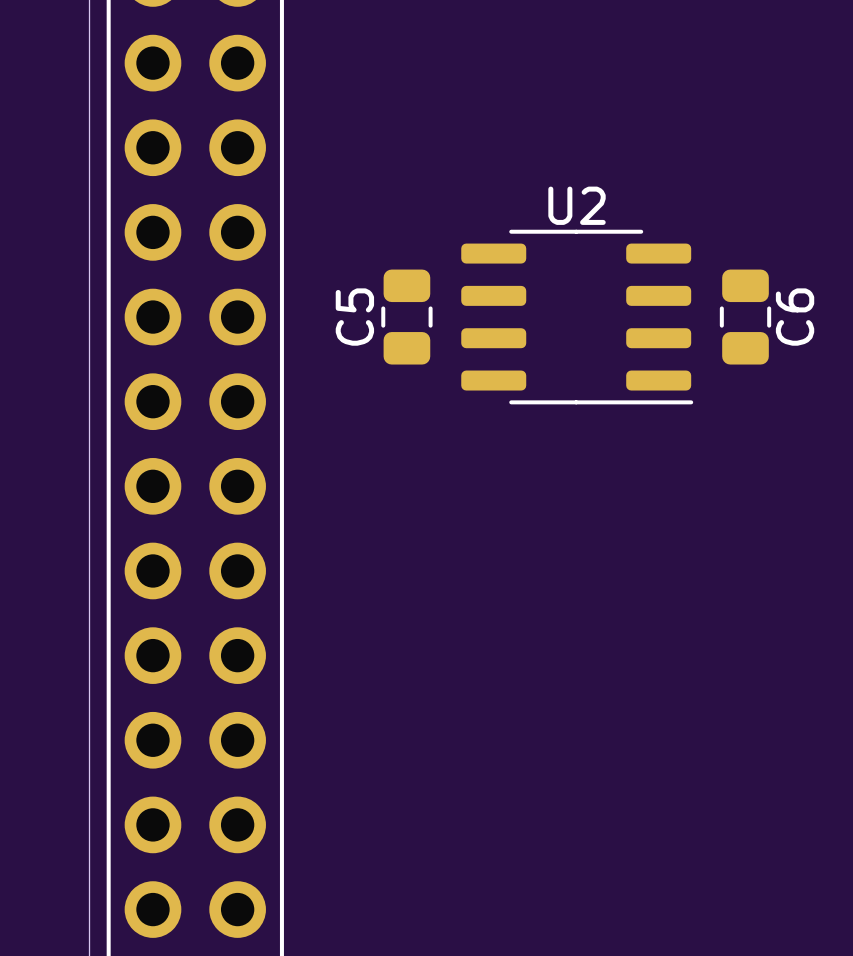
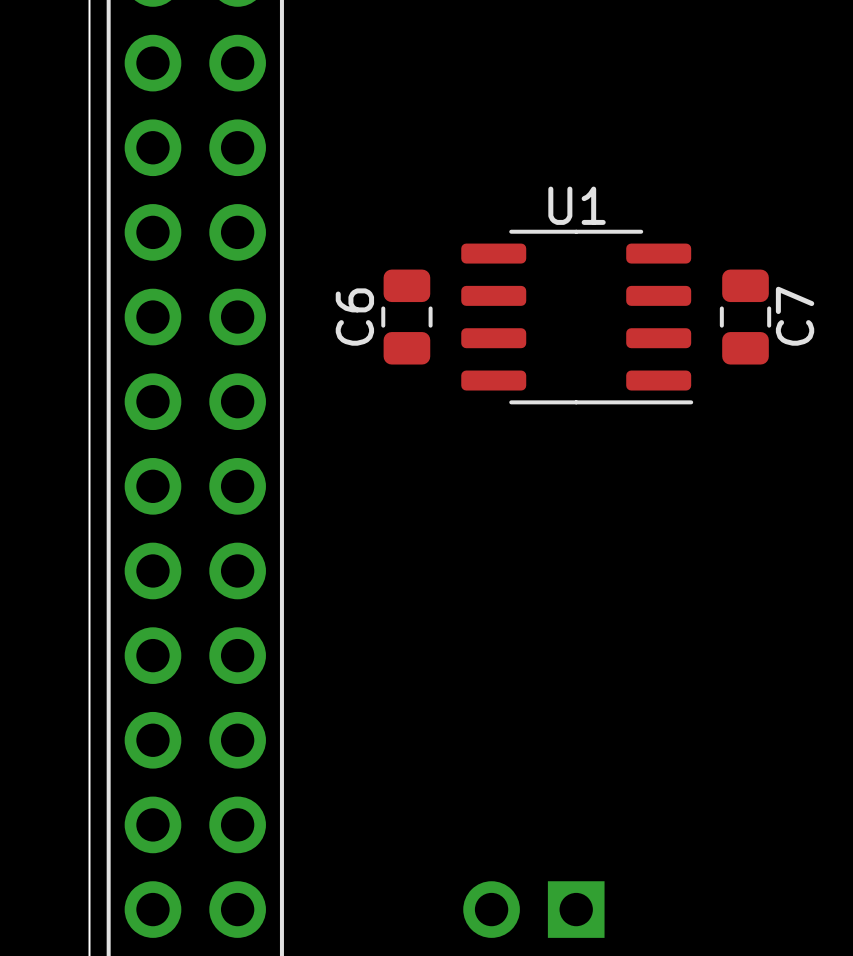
U2 name: U2 (577, 205) -> U1 (577, 205)
C5 name: C5 (354, 317) -> C6 (354, 317)
C6 name: C6 (795, 317) -> C7 (795, 316)
part: none -> (533, 909)

